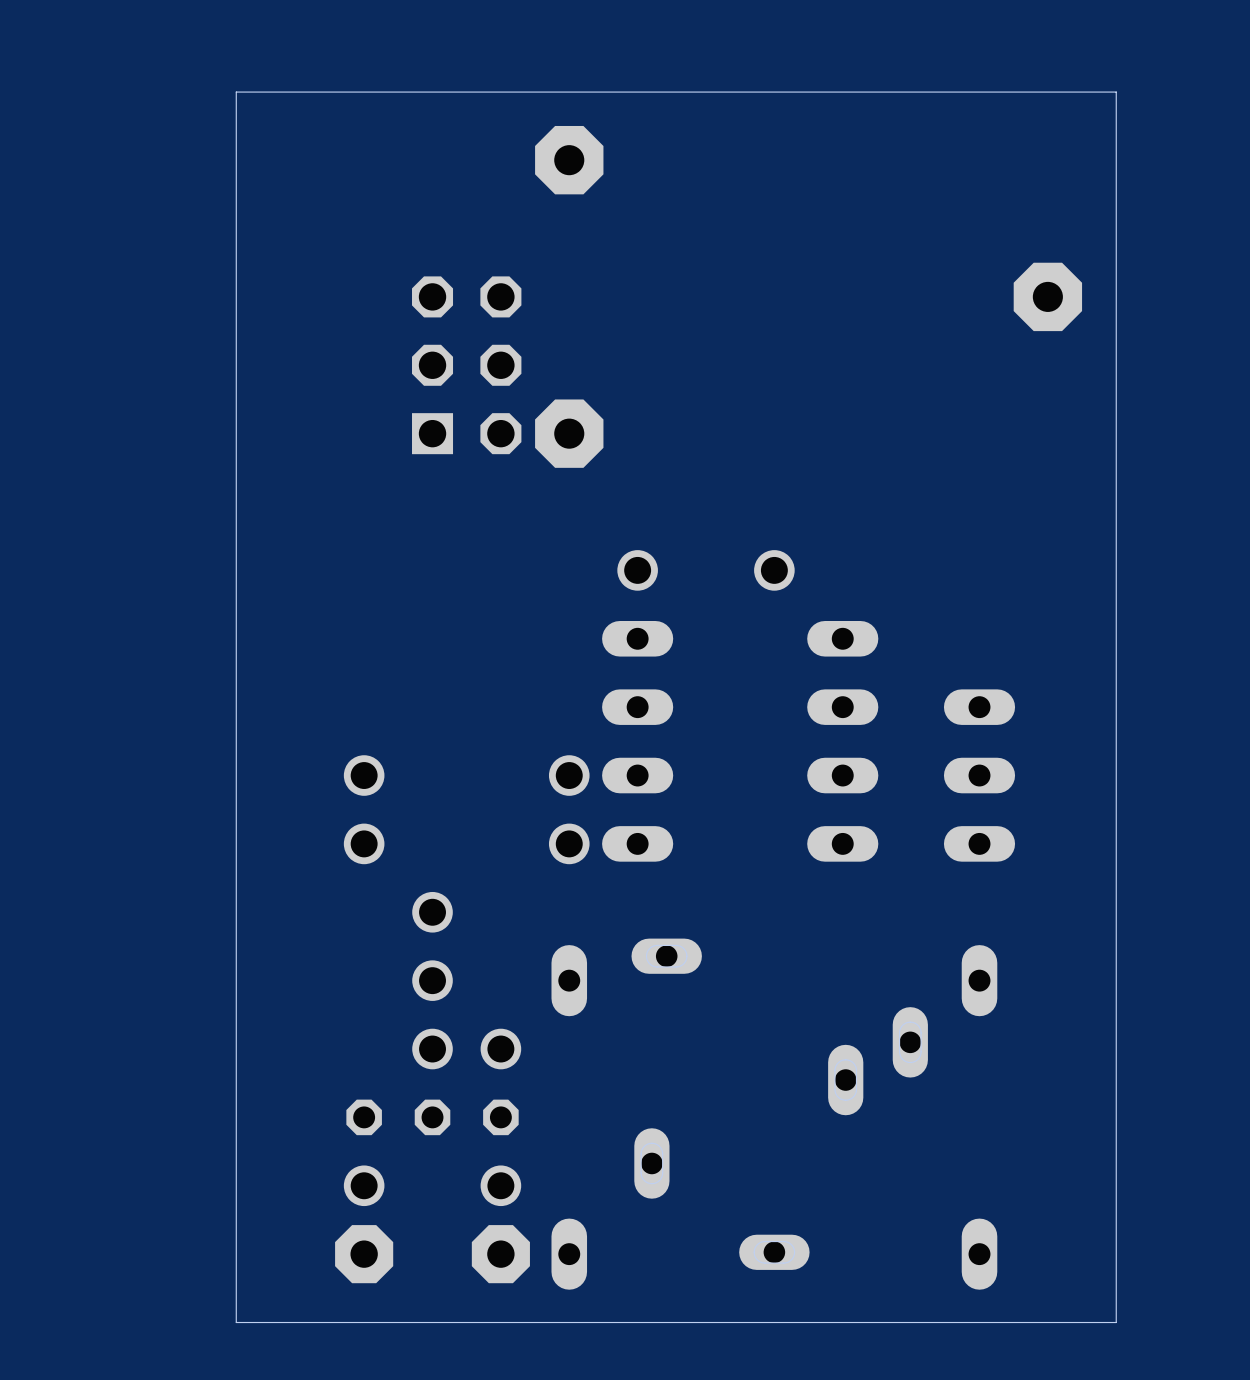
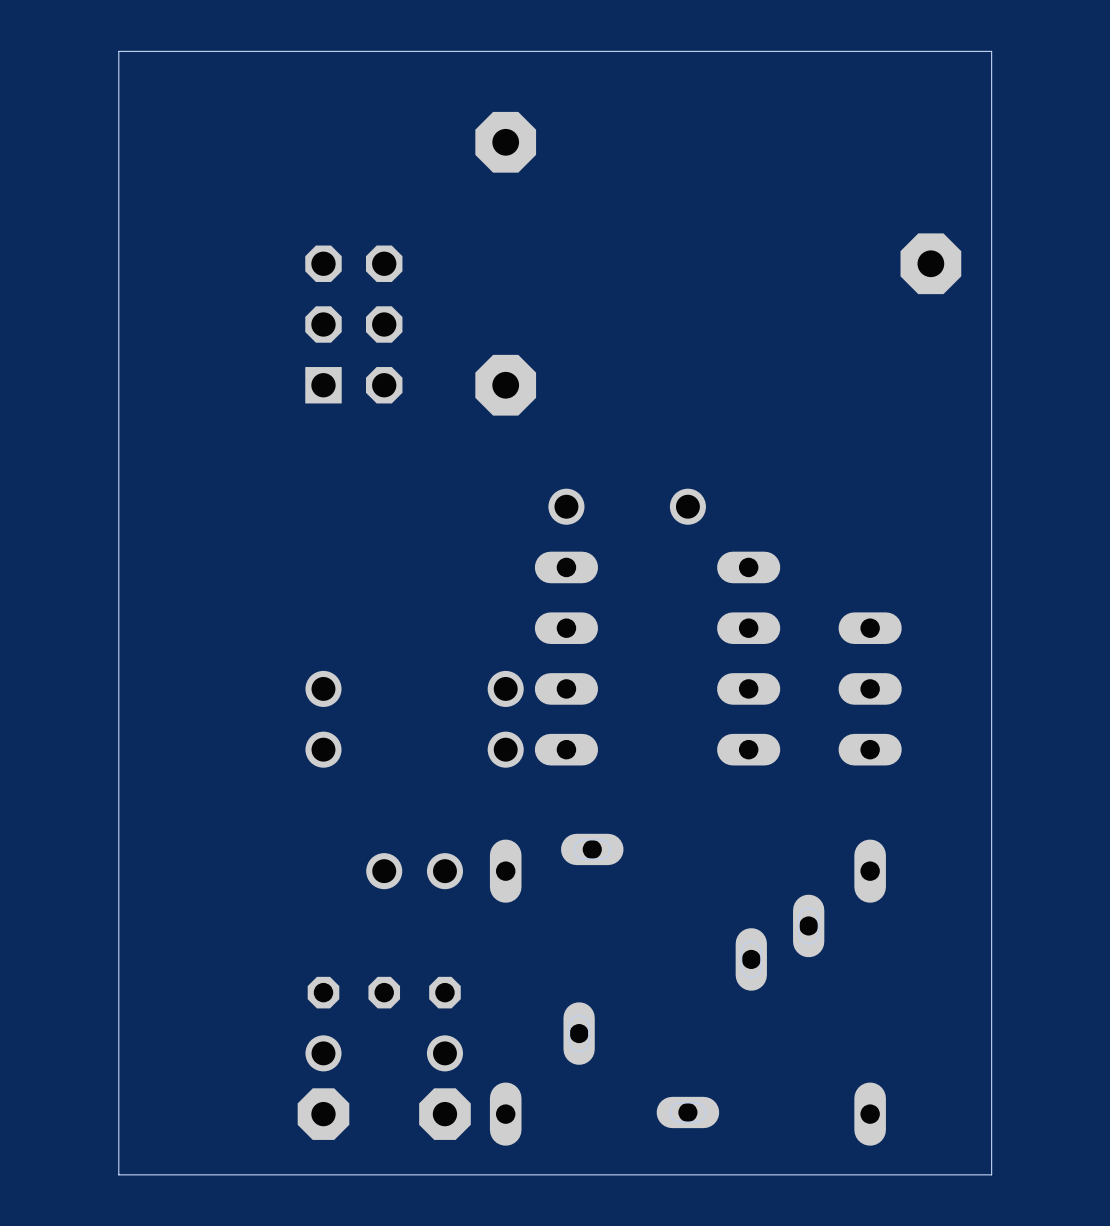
board edge: (1116, 92) (236, 92) (236, 1322) -> (991, 81) (991, 51) (118, 51) (118, 1174) (209, 1174)
part position: (466, 365) -> (353, 324)
part: (432, 946) -> none
part: none -> (414, 871)
part: (466, 1049) -> none

